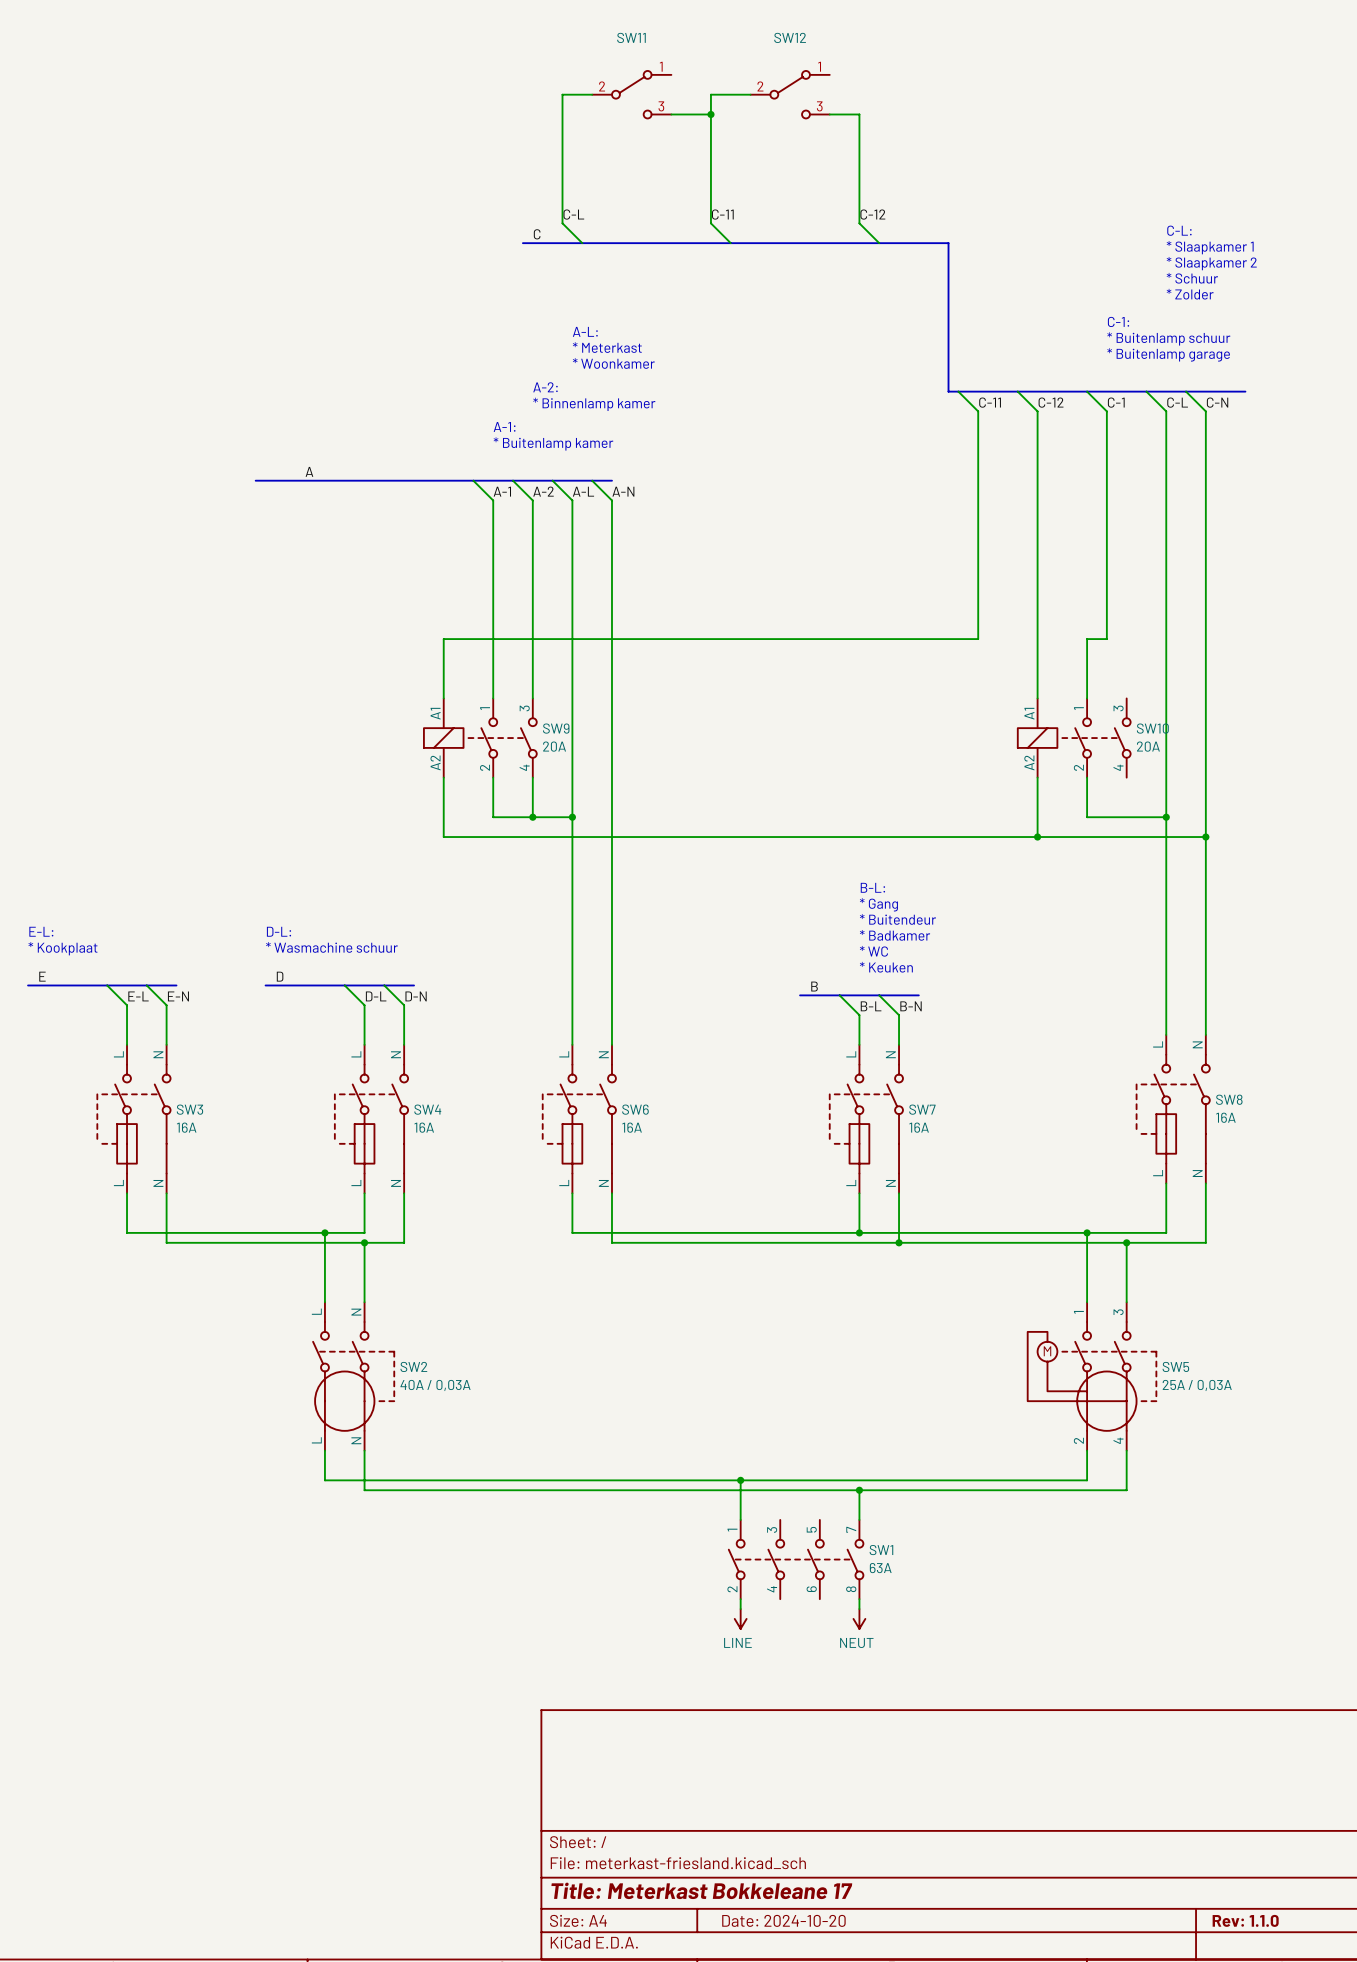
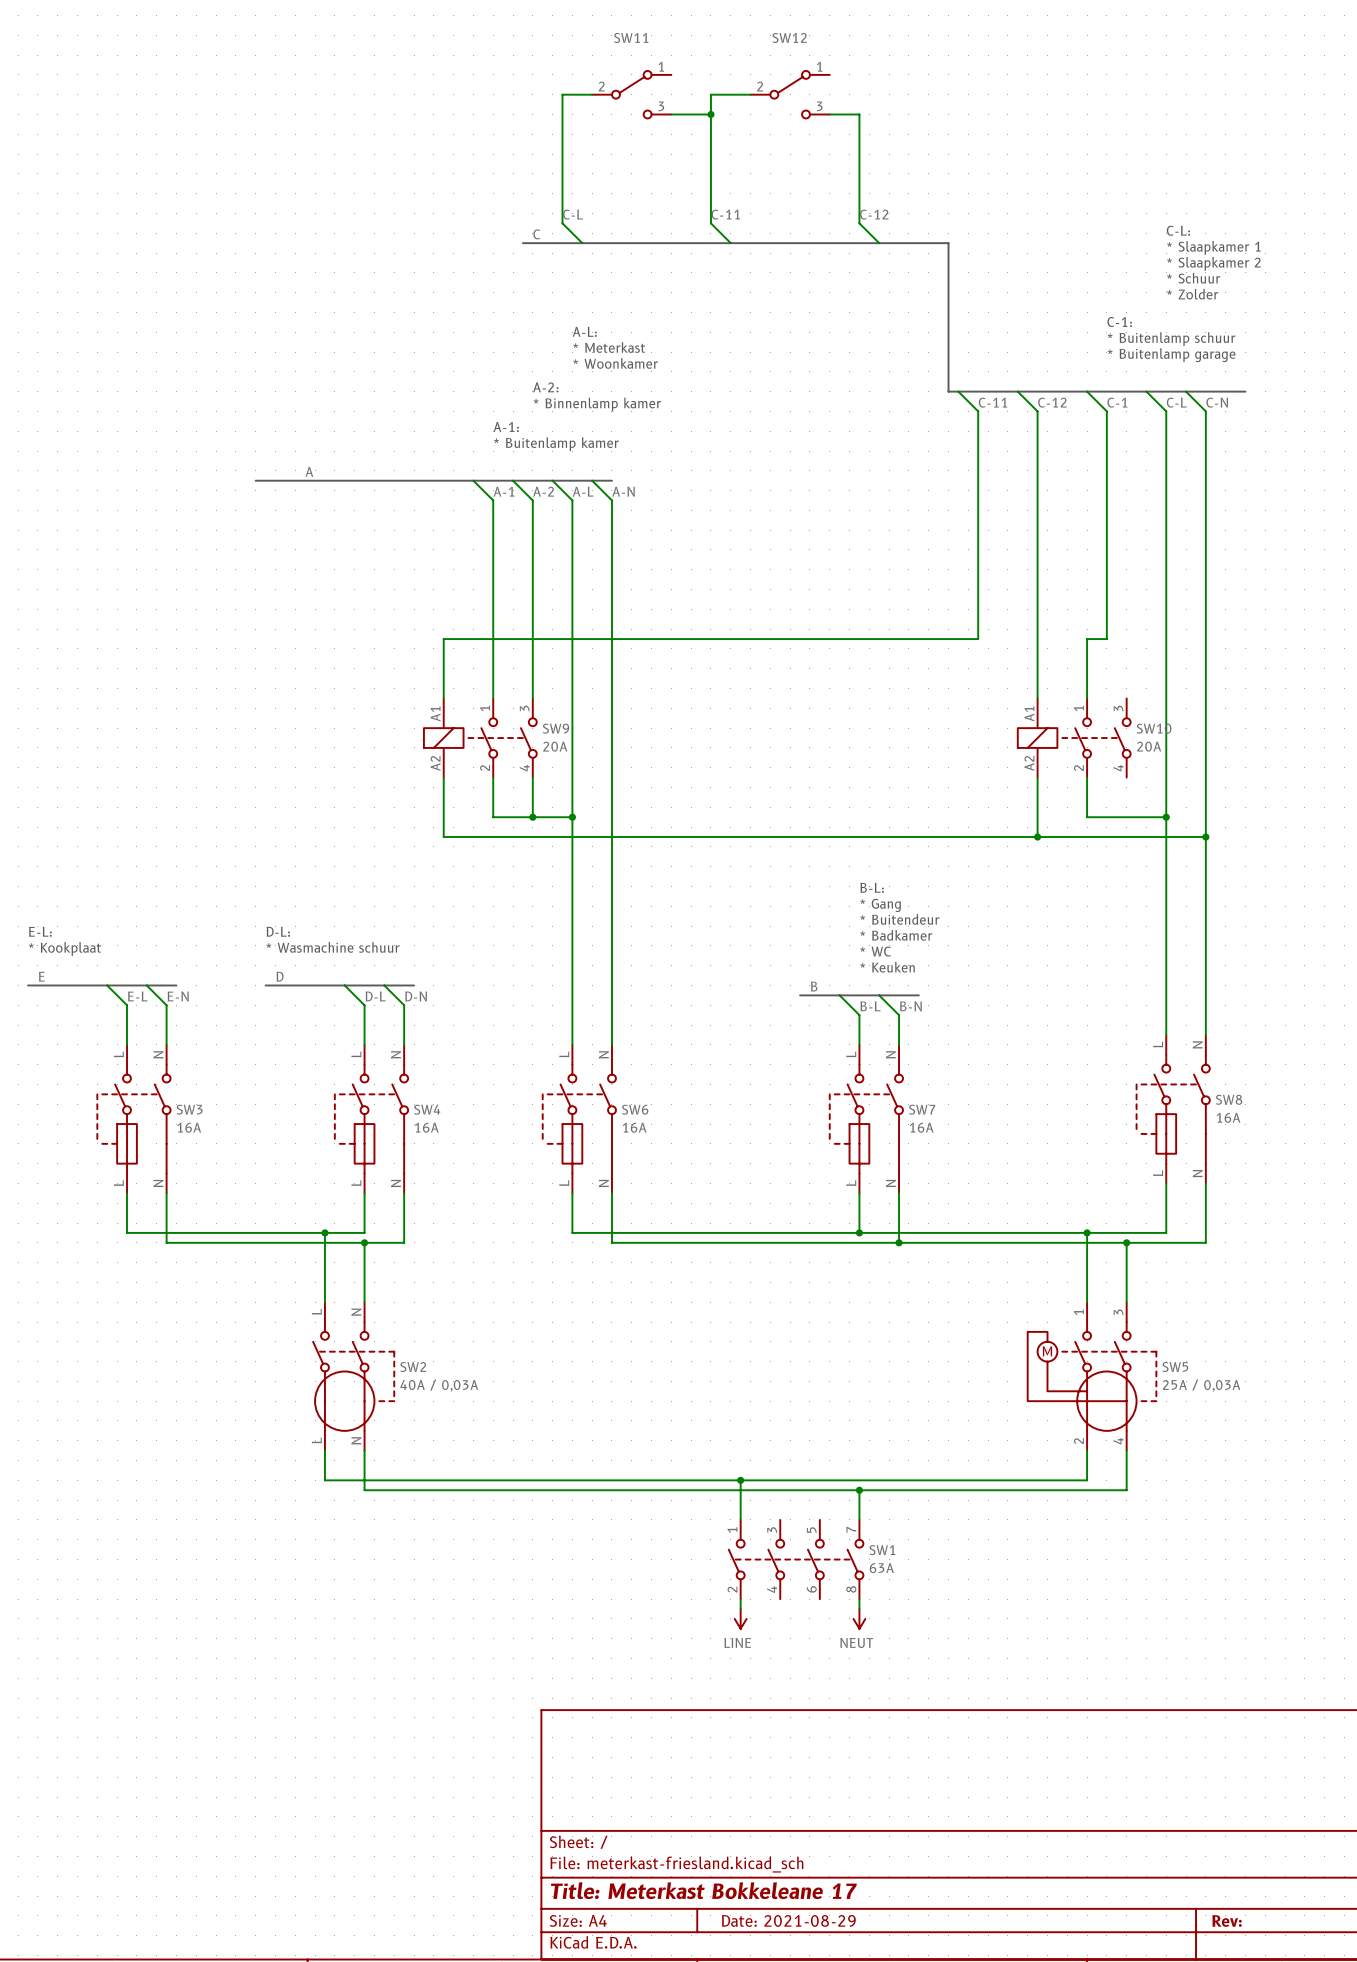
title block: Date: 2024-10-20 (783, 1920) -> Date: 2021-08-29 (788, 1920)
title block: Rev: 1.1.0 (1245, 1920) -> Rev: (1227, 1921)

